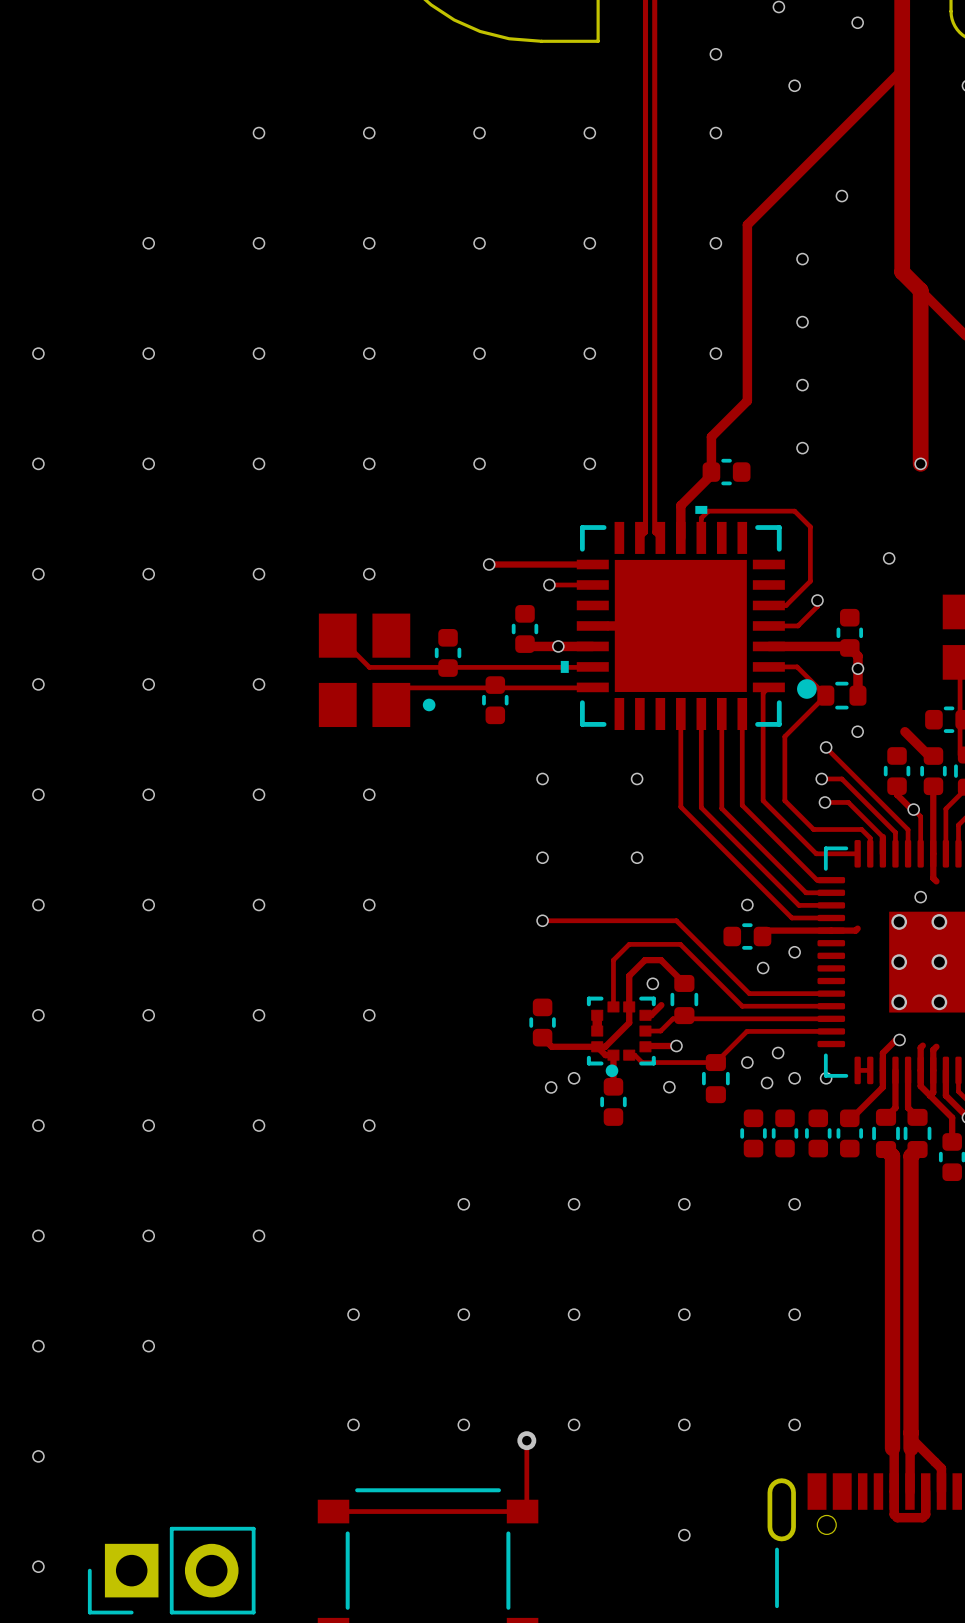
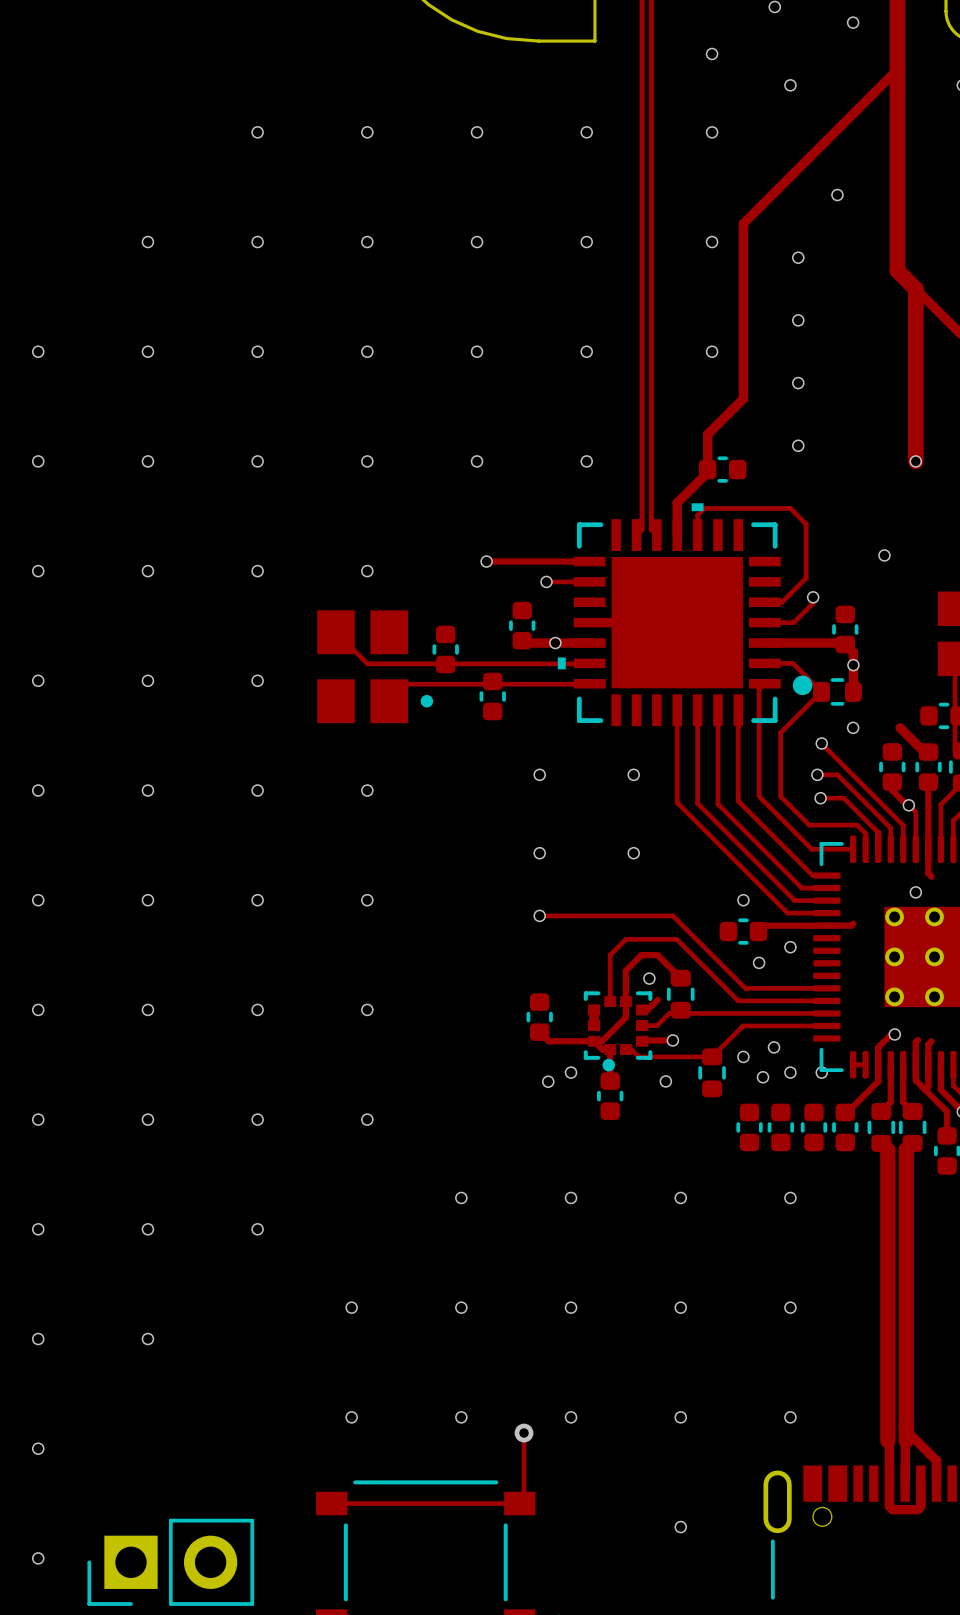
via: (899, 921) -> none
part: none -> (894, 916)
via: (939, 921) -> none
part: none -> (934, 916)
via: (899, 962) -> none
part: none -> (894, 956)
via: (939, 962) -> none
part: none -> (934, 956)
via: (899, 1002) -> none
part: none -> (894, 996)
via: (939, 1002) -> none
part: none -> (934, 996)

